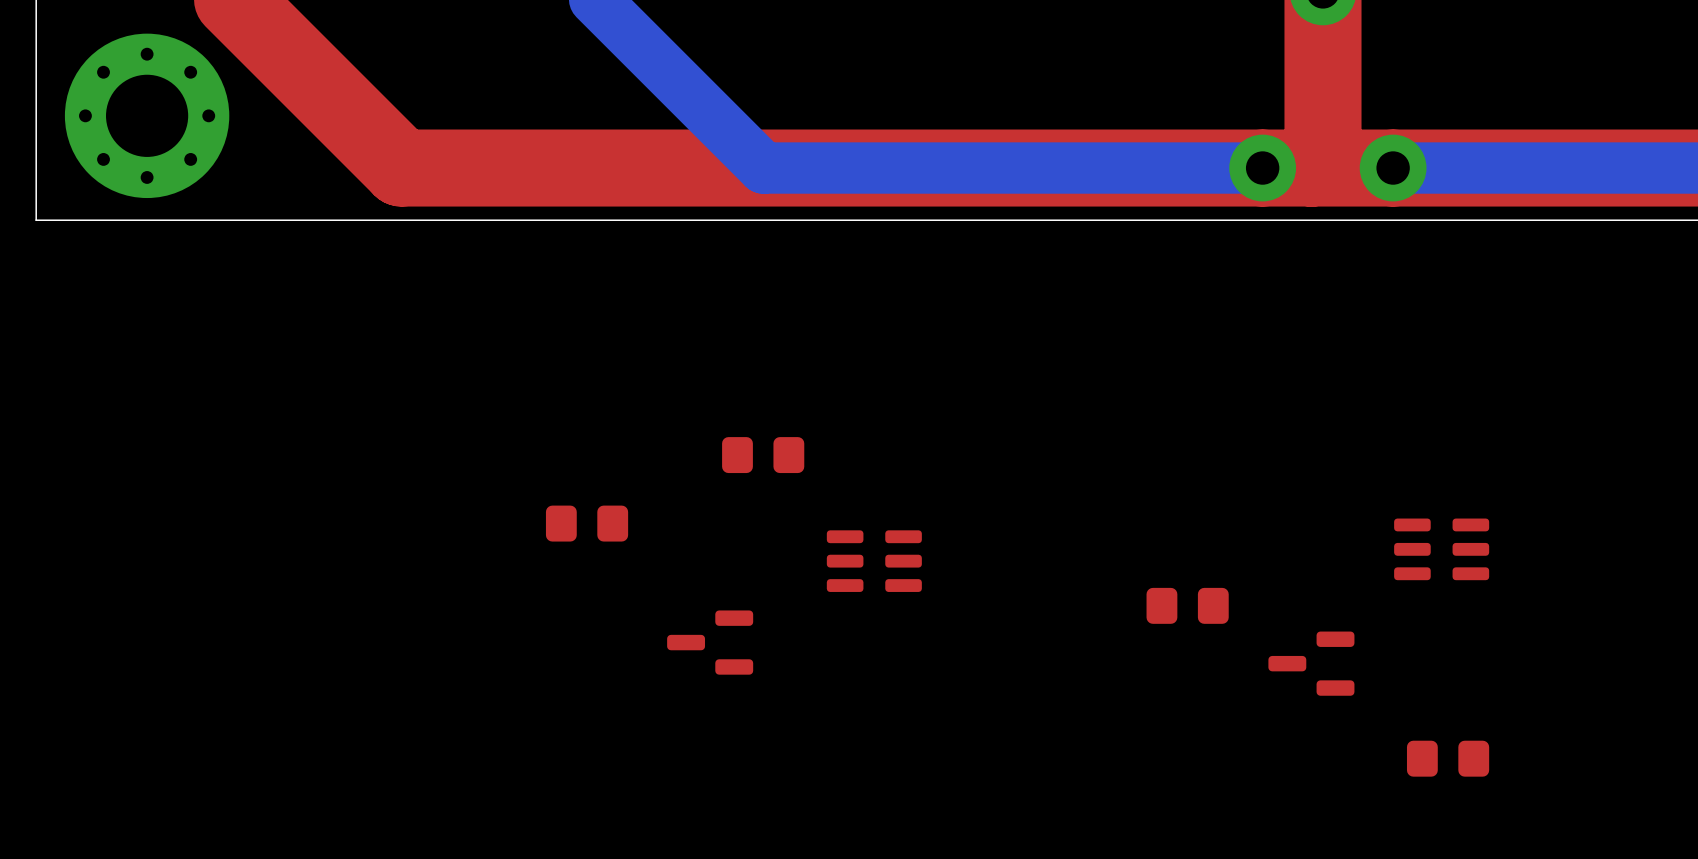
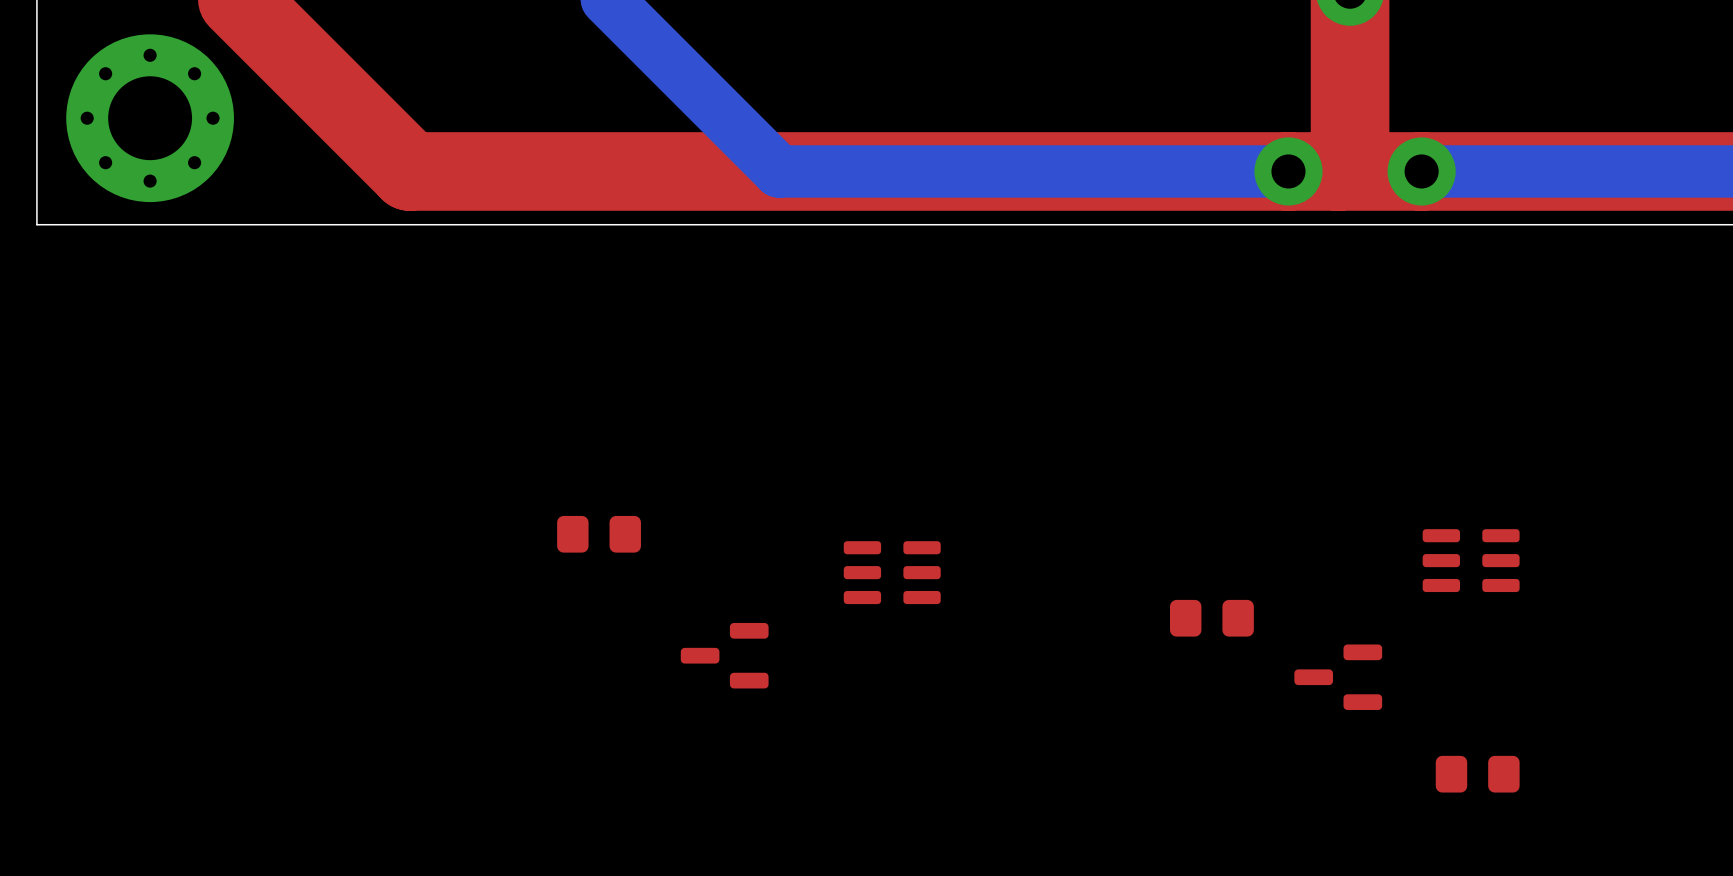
part: (763, 455) -> none

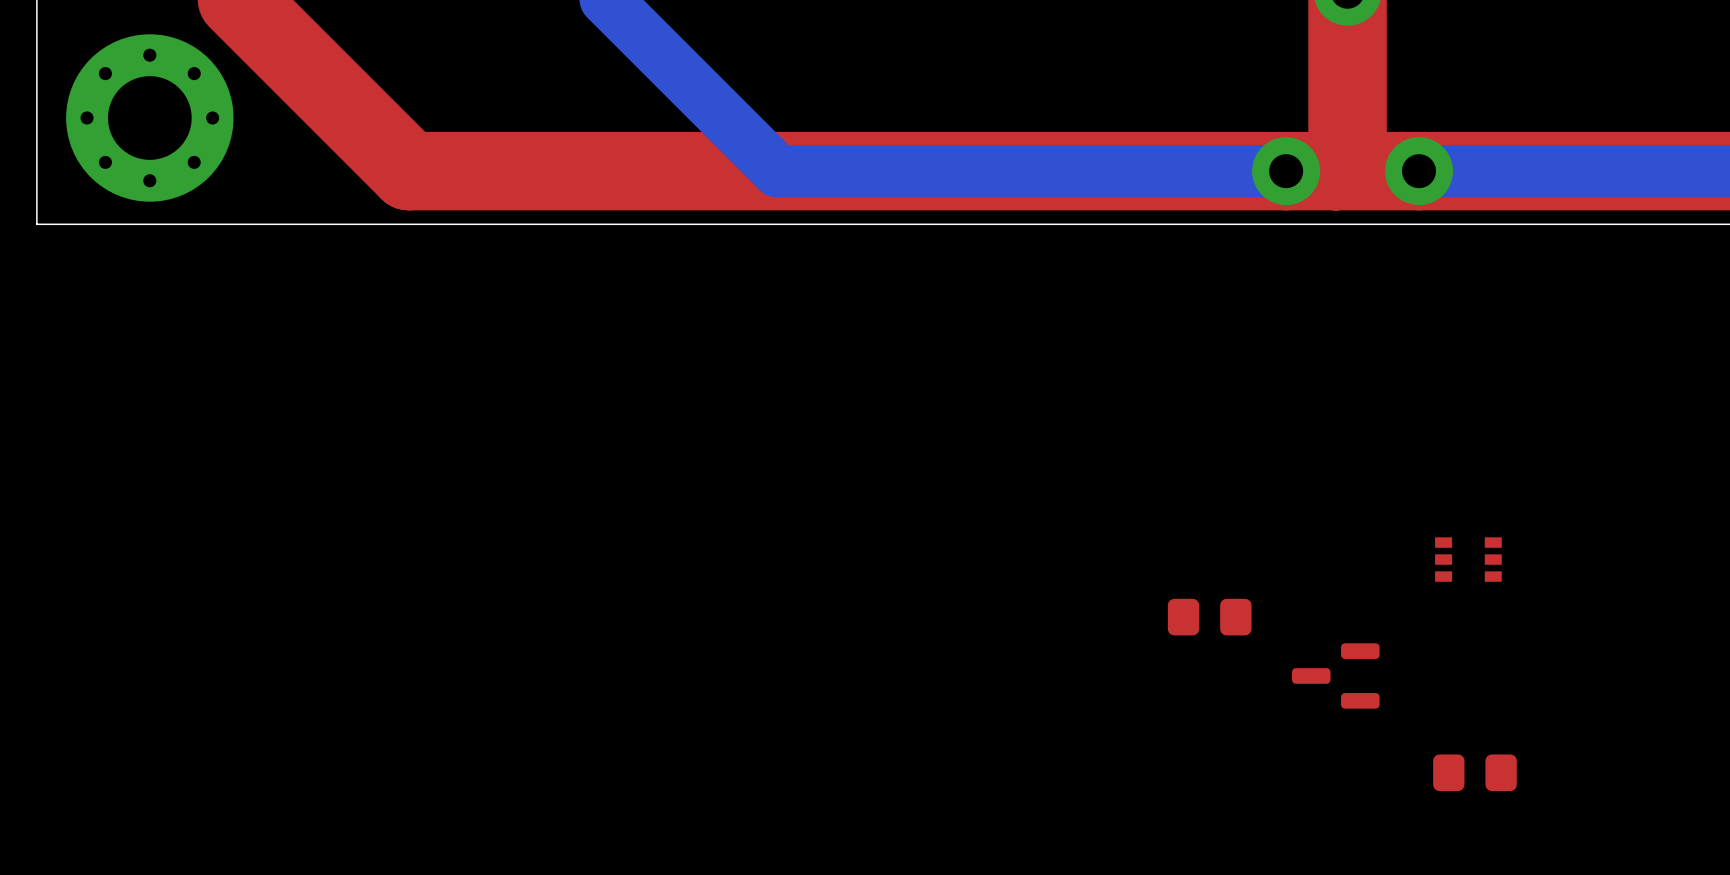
part footprint: [1422, 529, 1520, 593] -> [1435, 537, 1502, 582]
part: (599, 534) -> none
part: (892, 572) -> none
part: (724, 655) -> none

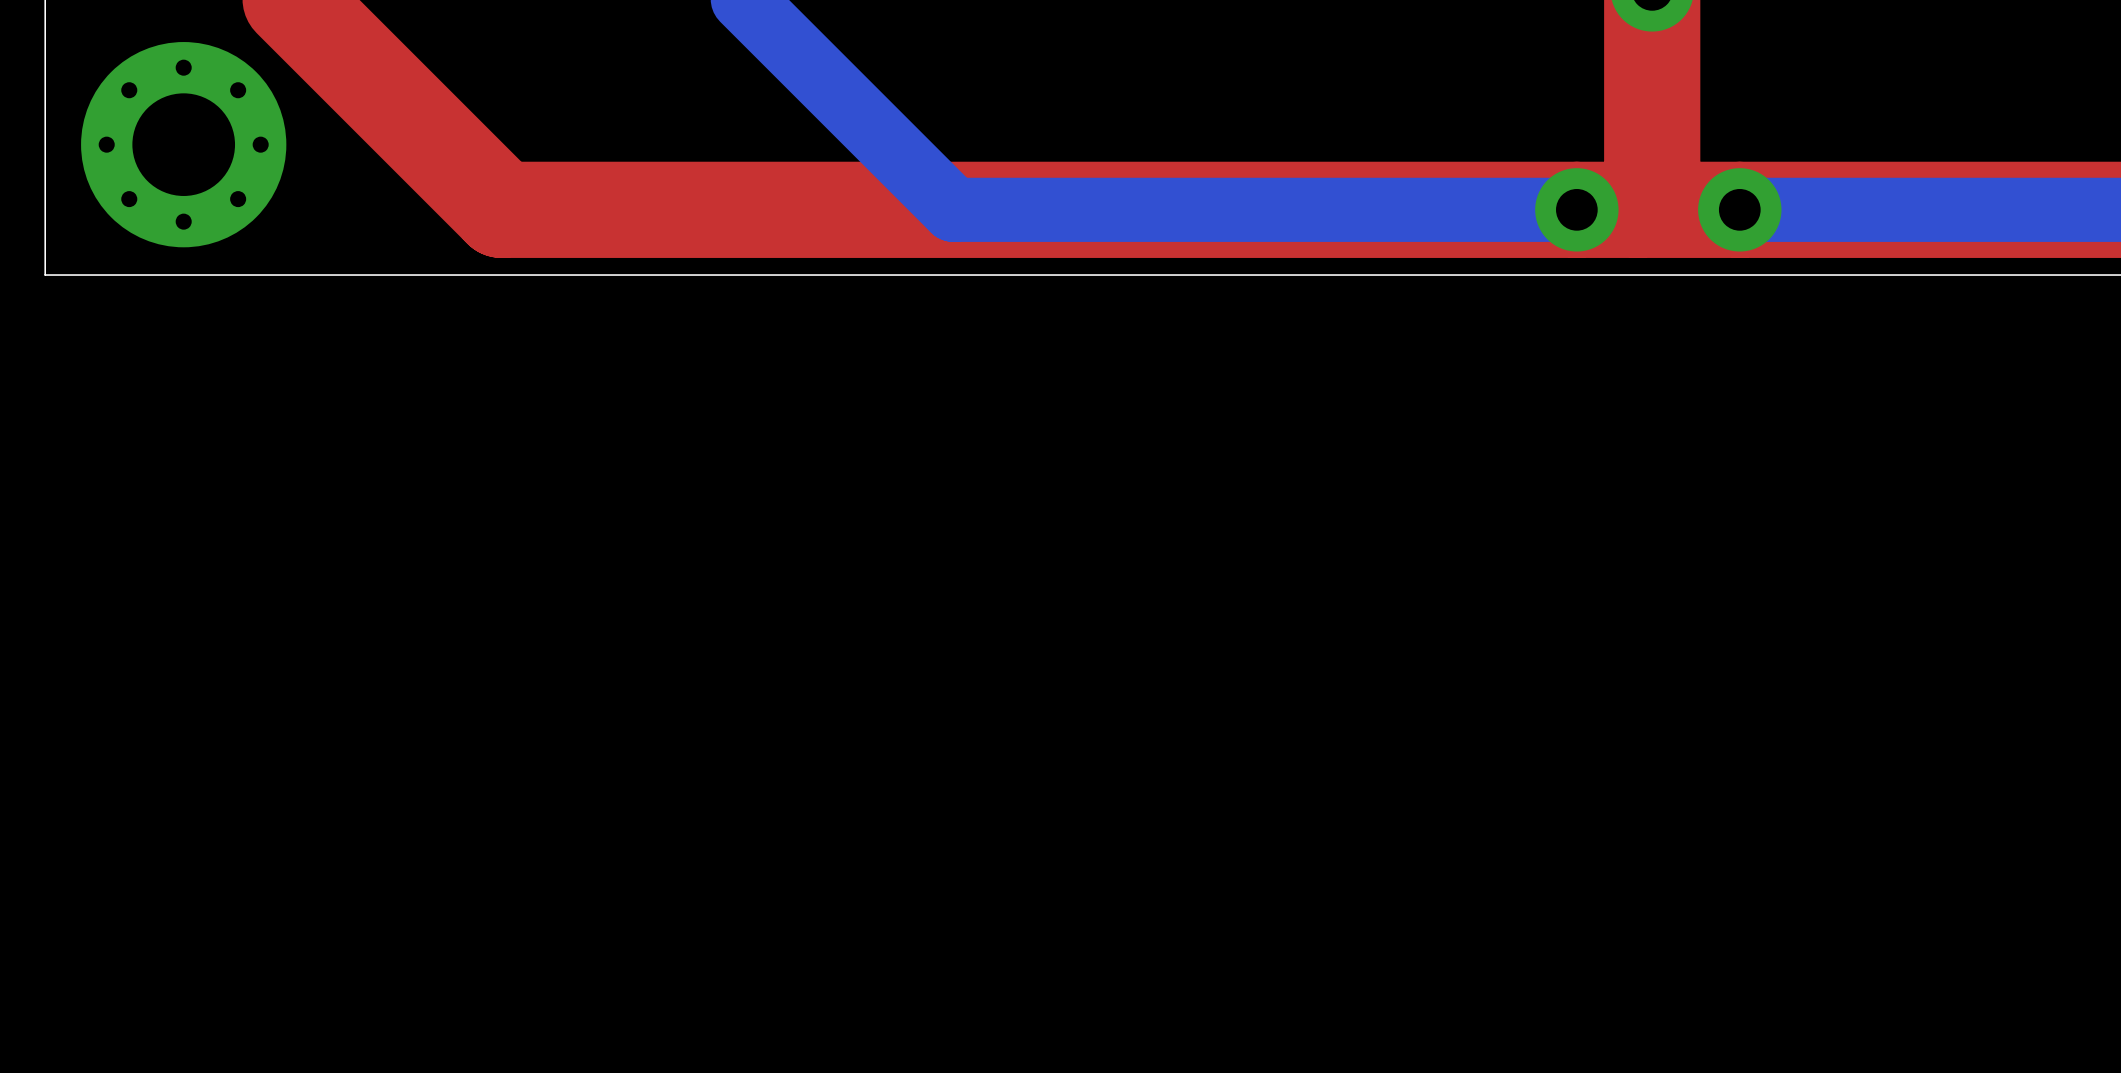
part: (1468, 559) -> none
part: (1209, 617) -> none
part: (1335, 675) -> none
part: (1474, 772) -> none

